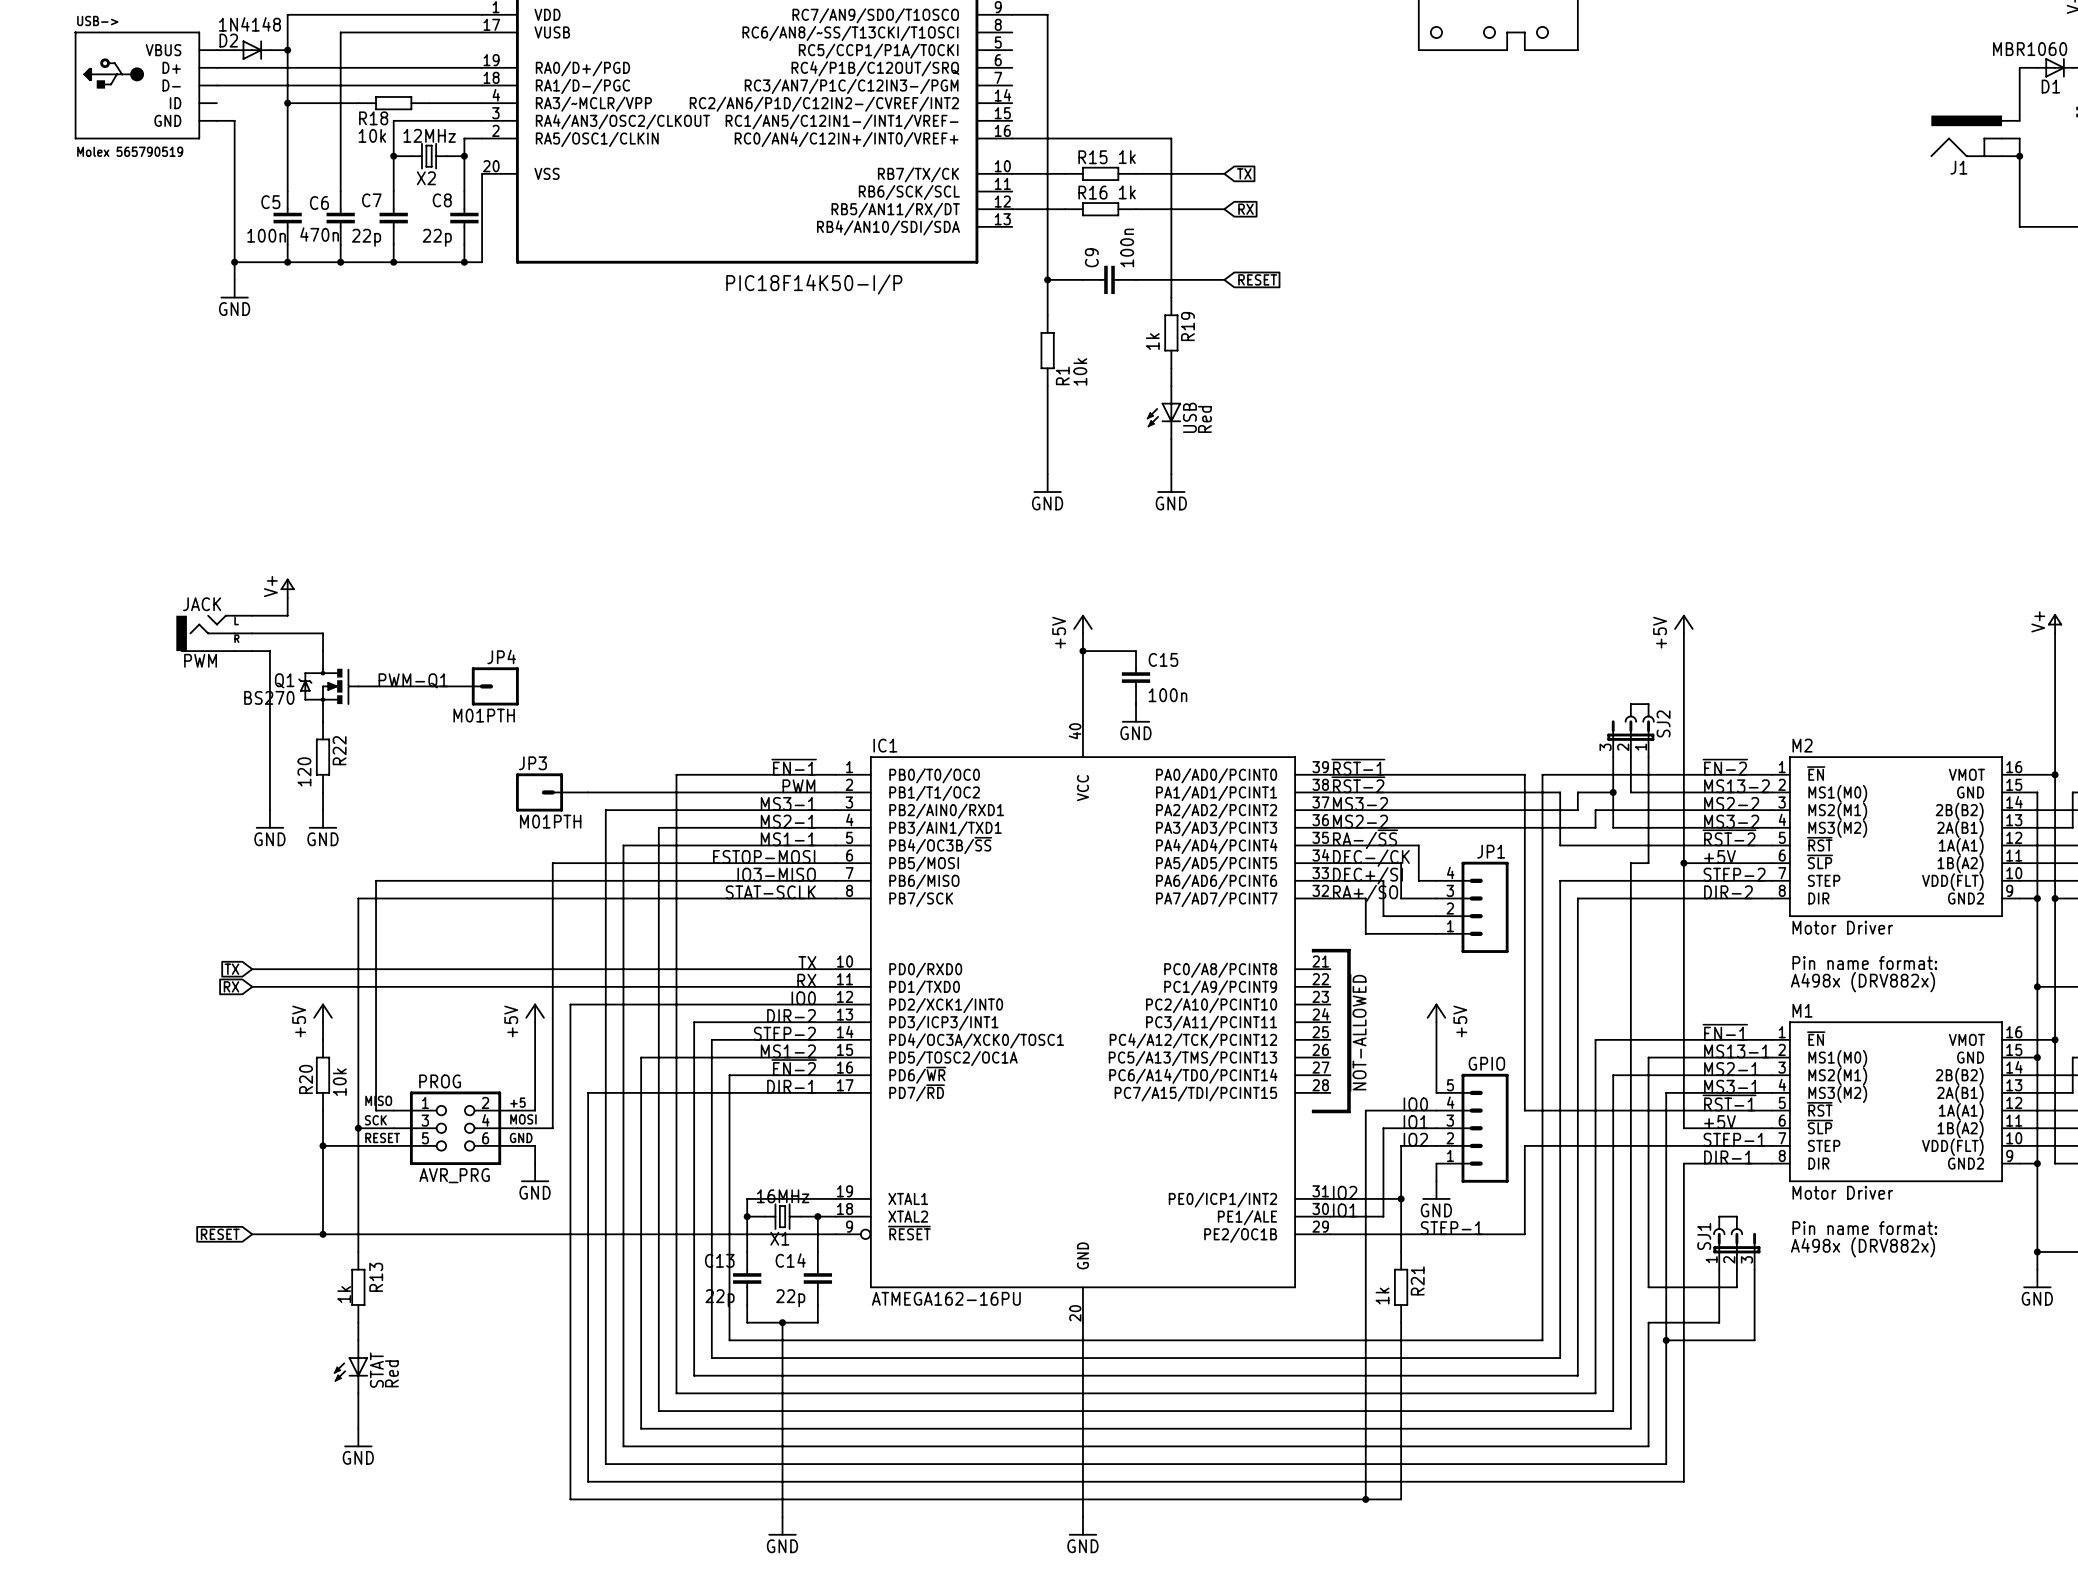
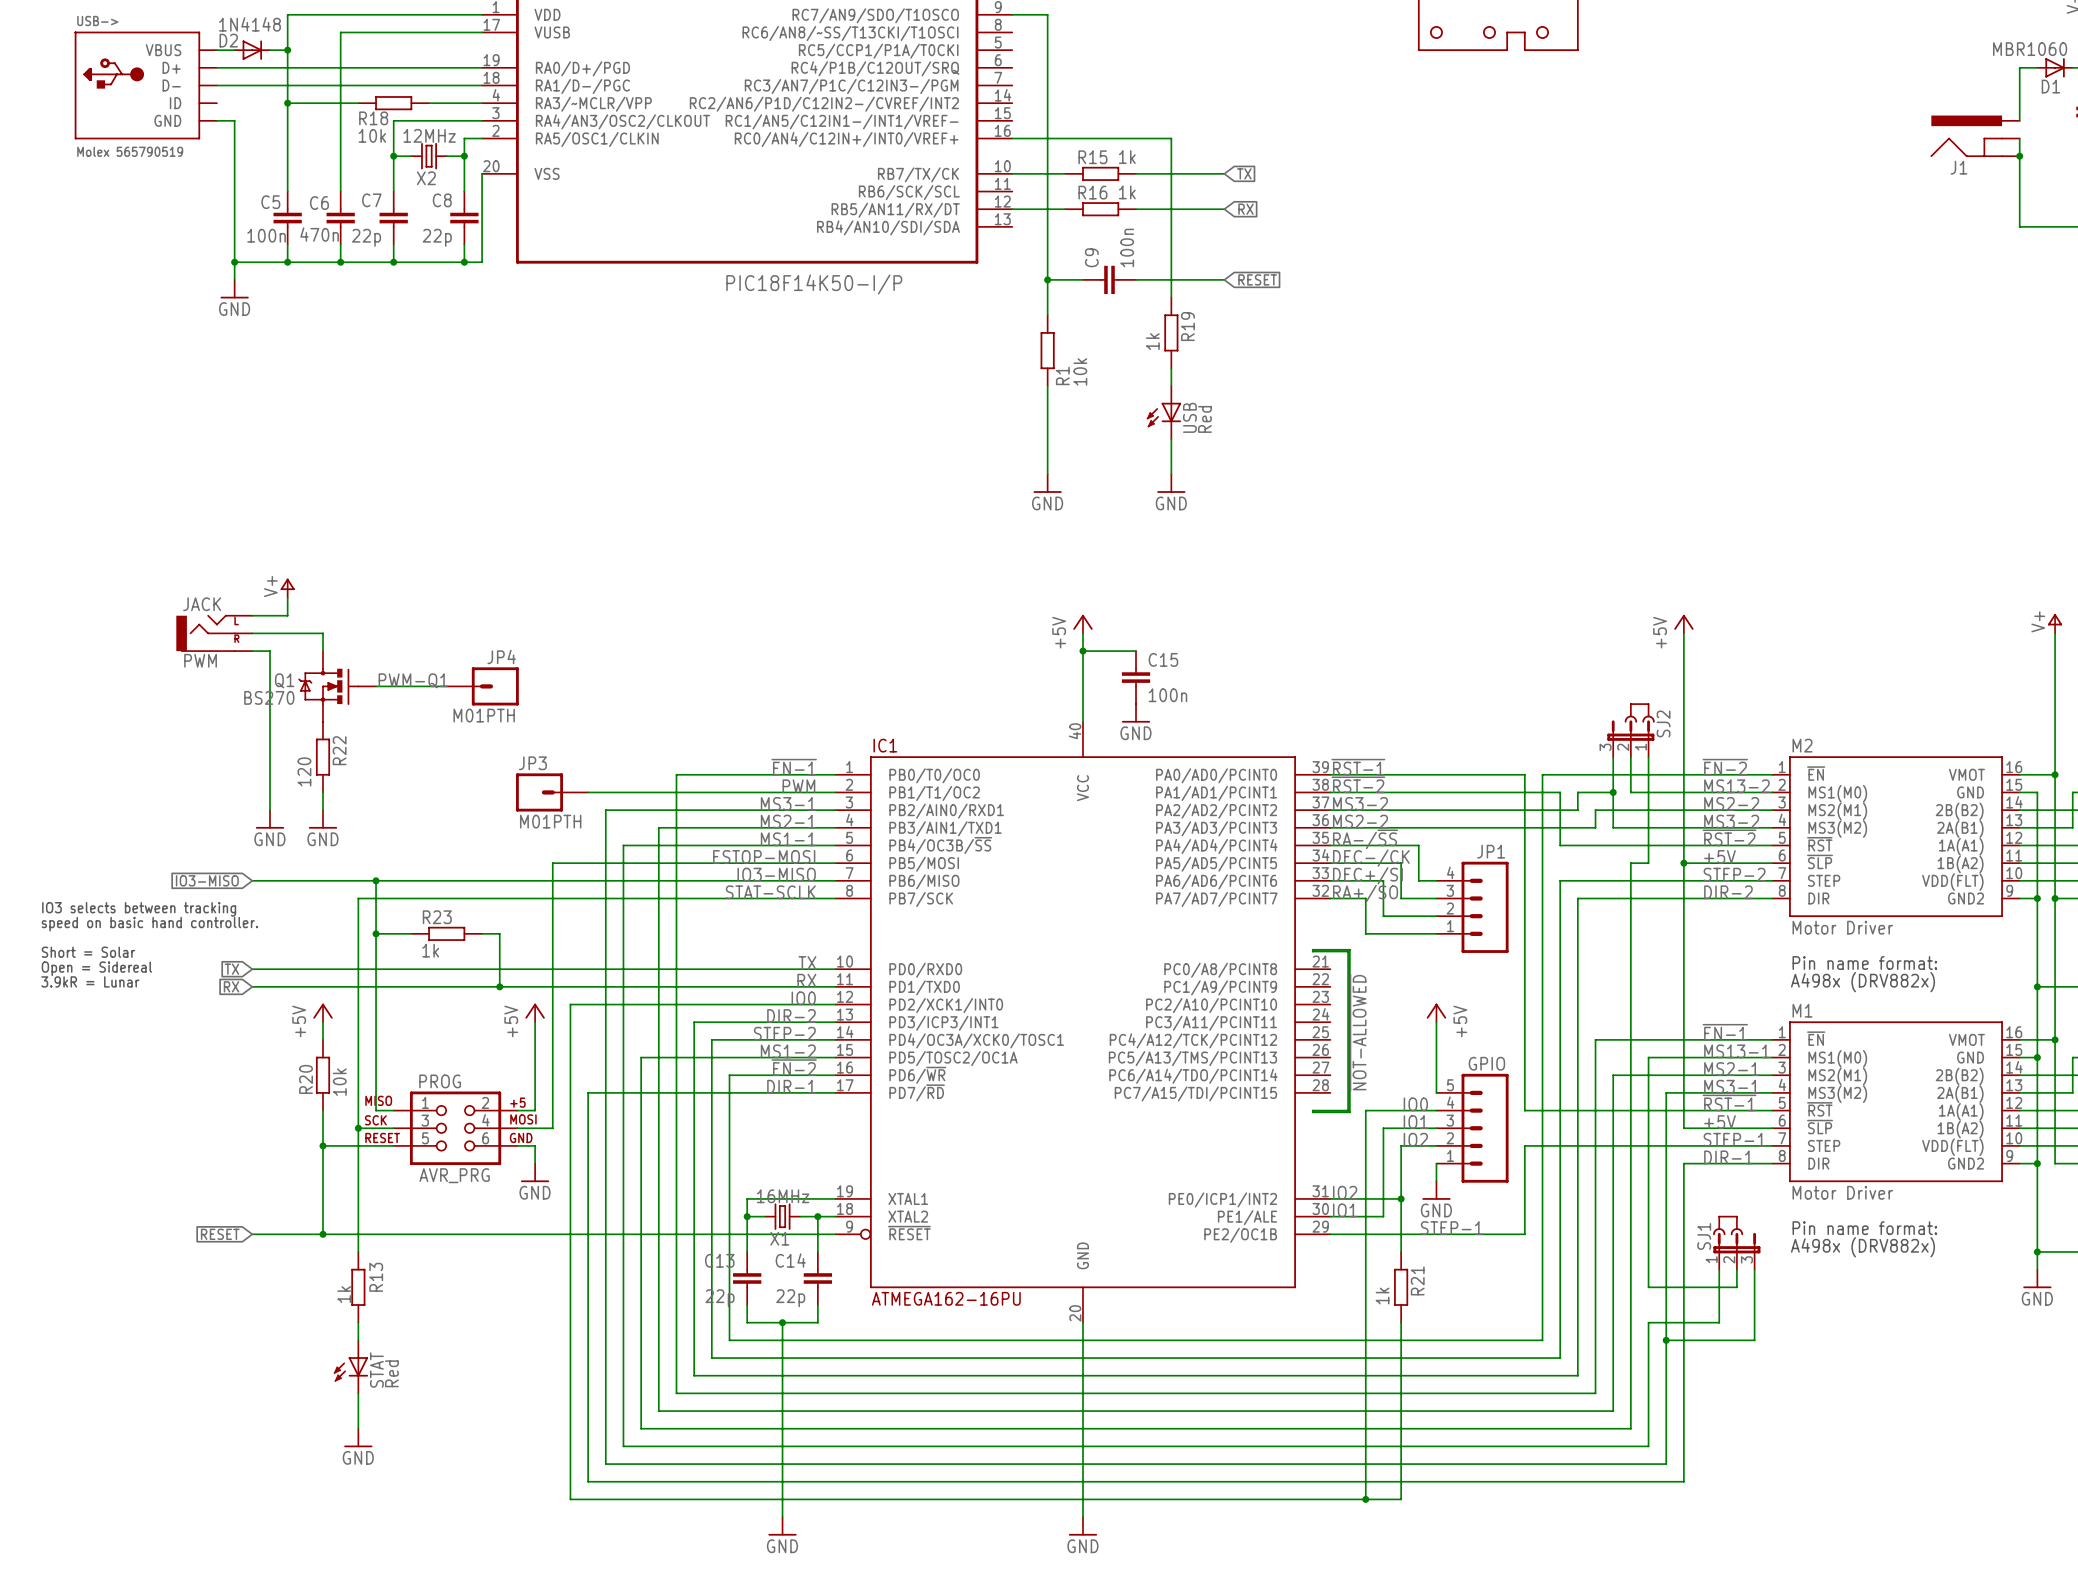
global label: none -> IO3-MISO (207, 880)
wire: none -> (252, 880) (376, 880)
junction: none -> (376, 880)
text: none -> IO3 selects between tracking (139, 909)
text: none -> speed on basic hand controller. (149, 924)
wire: none -> (376, 933) (411, 933)
junction: none -> (376, 933)
R23: none -> 1k (446, 933)
wire: none -> (482, 933) (499, 933) (499, 986)
text: none -> Short = Solar (88, 952)
text: none -> Open = Sidereal (96, 968)
text: none -> 3.9kR = Lunar (90, 981)
junction: none -> (499, 986)

